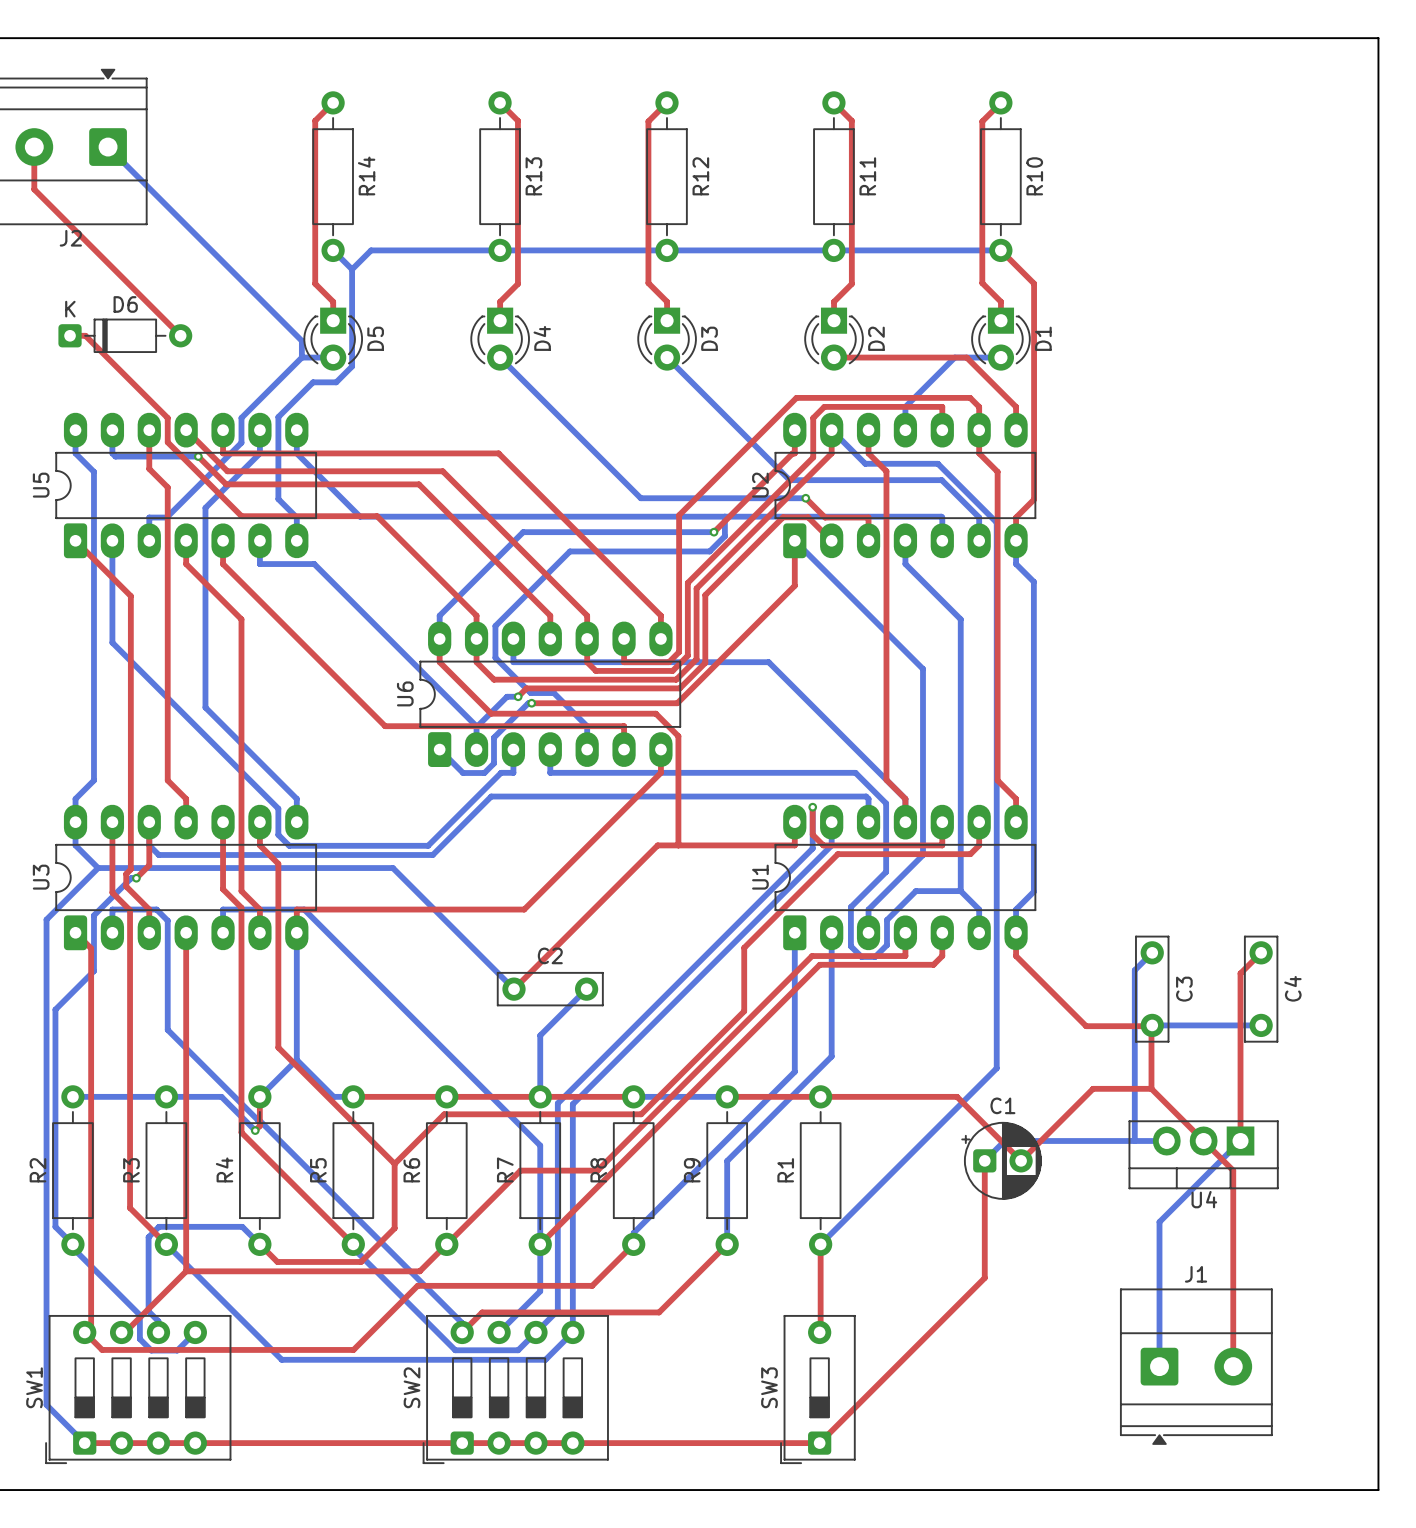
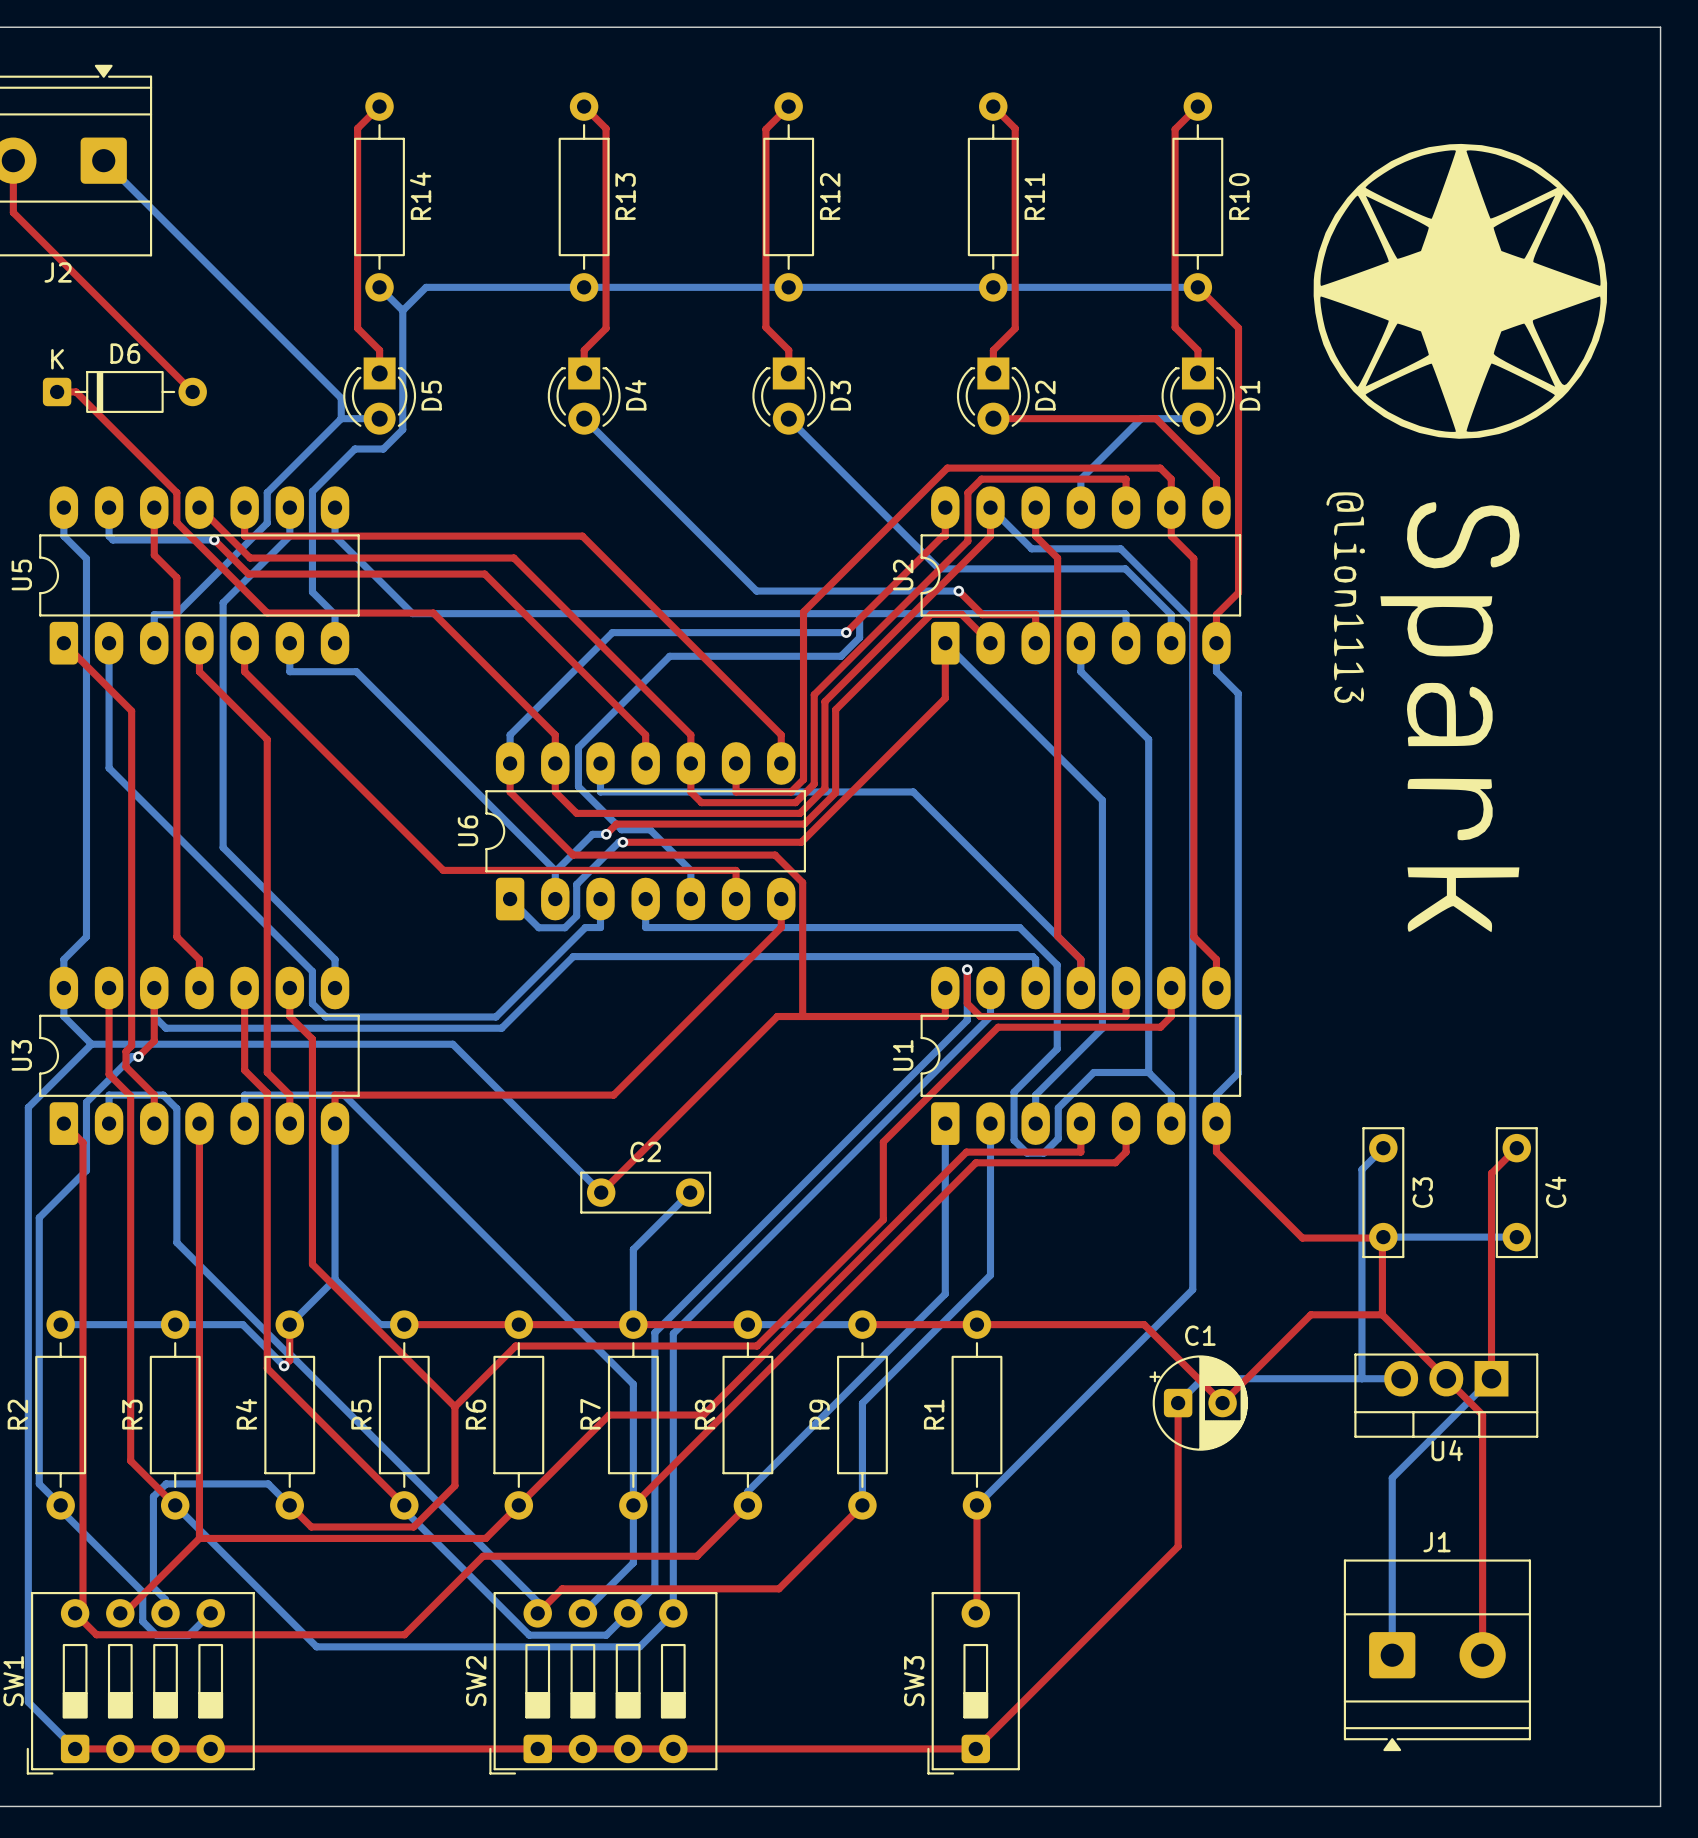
drawing: none -> [1313, 143, 1608, 933]

